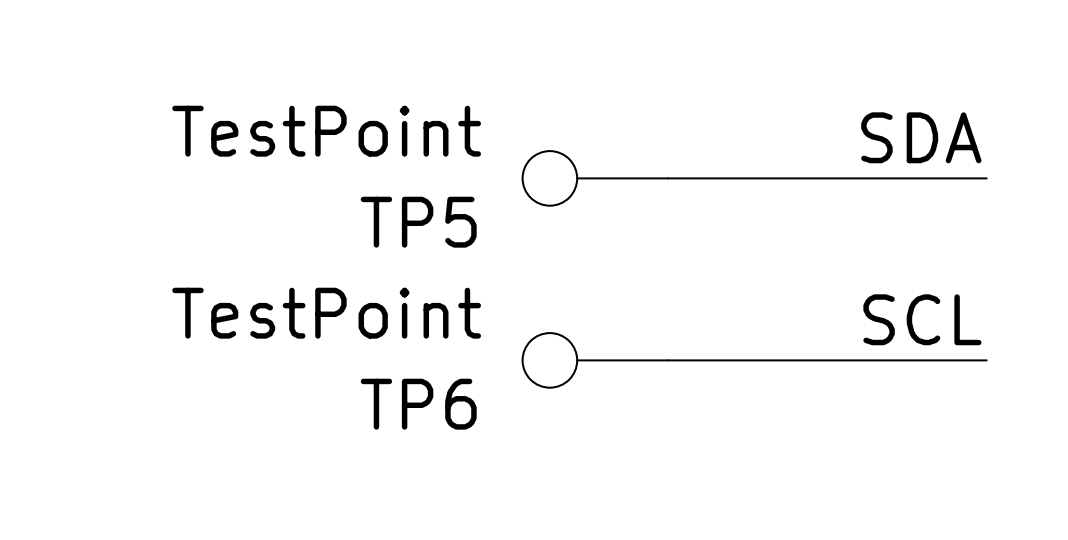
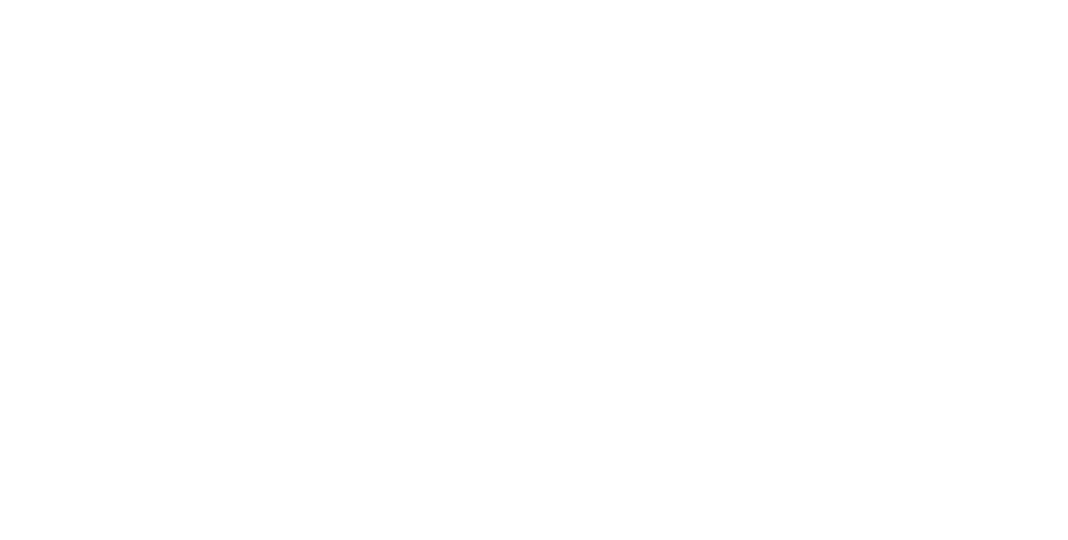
label: SDA (921, 137) -> none
TP5: TestPoint (595, 178) -> none
wire: (668, 178) (986, 178) -> none
label: SCL (922, 319) -> none
TP6: TestPoint (595, 360) -> none
wire: (668, 360) (986, 360) -> none

